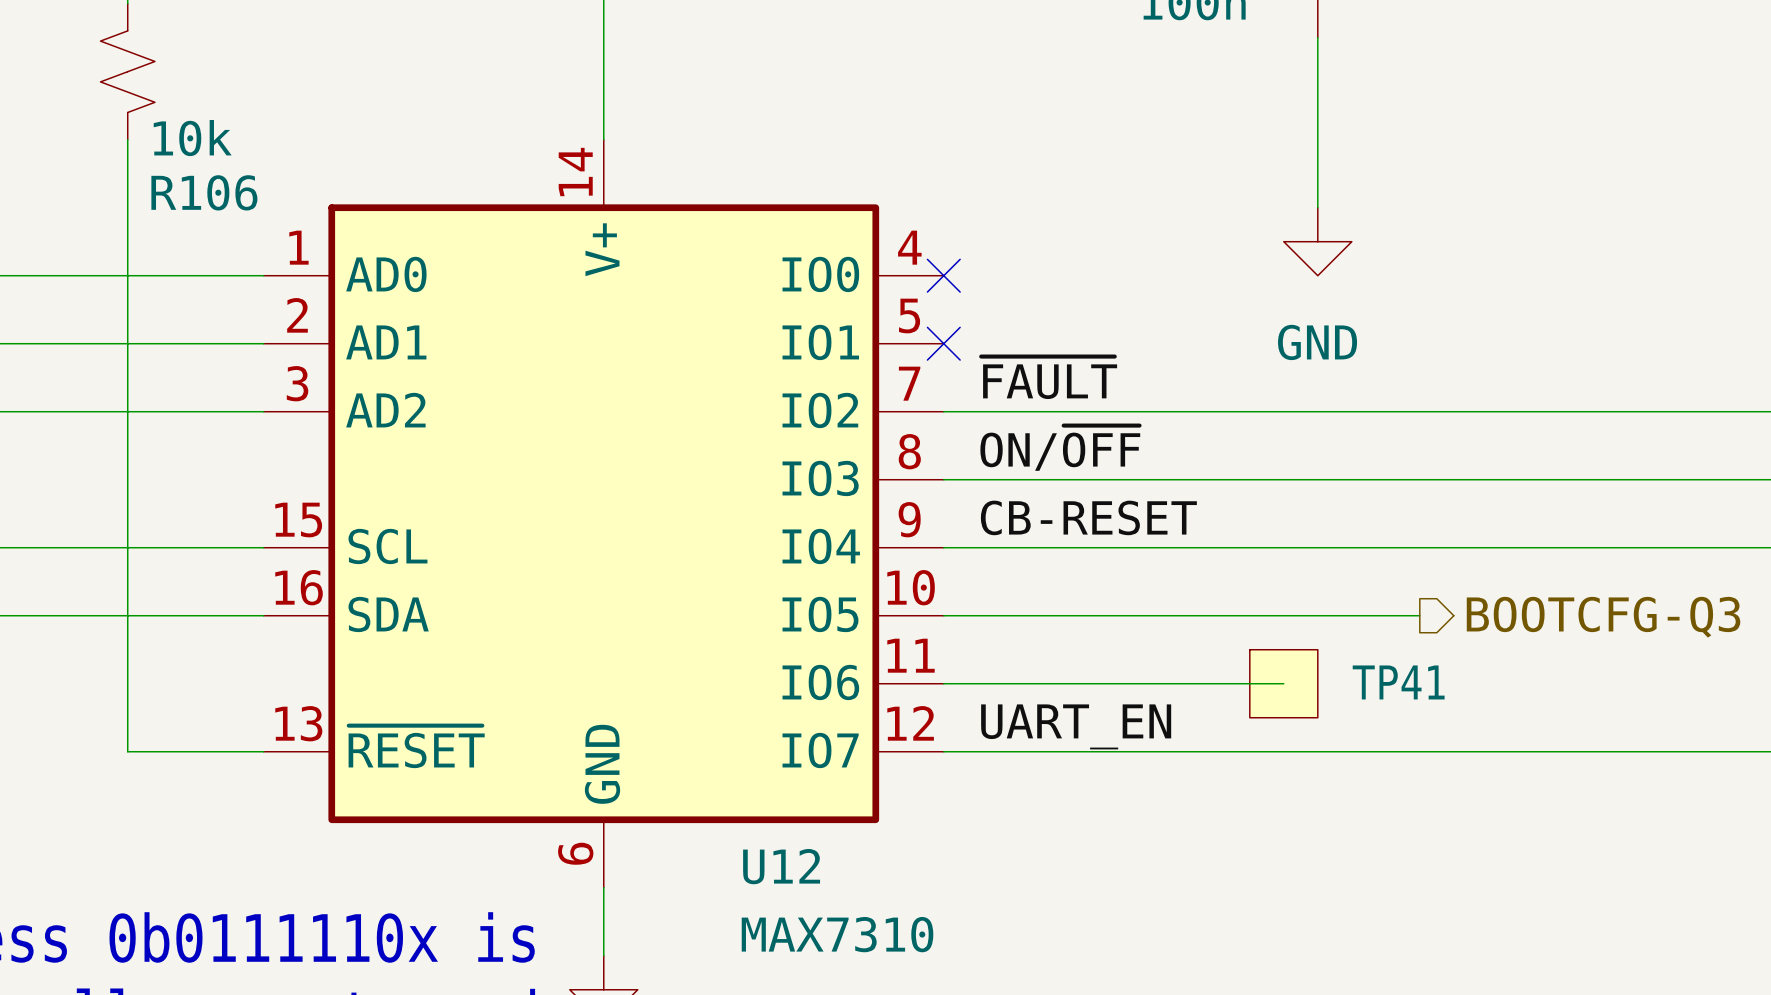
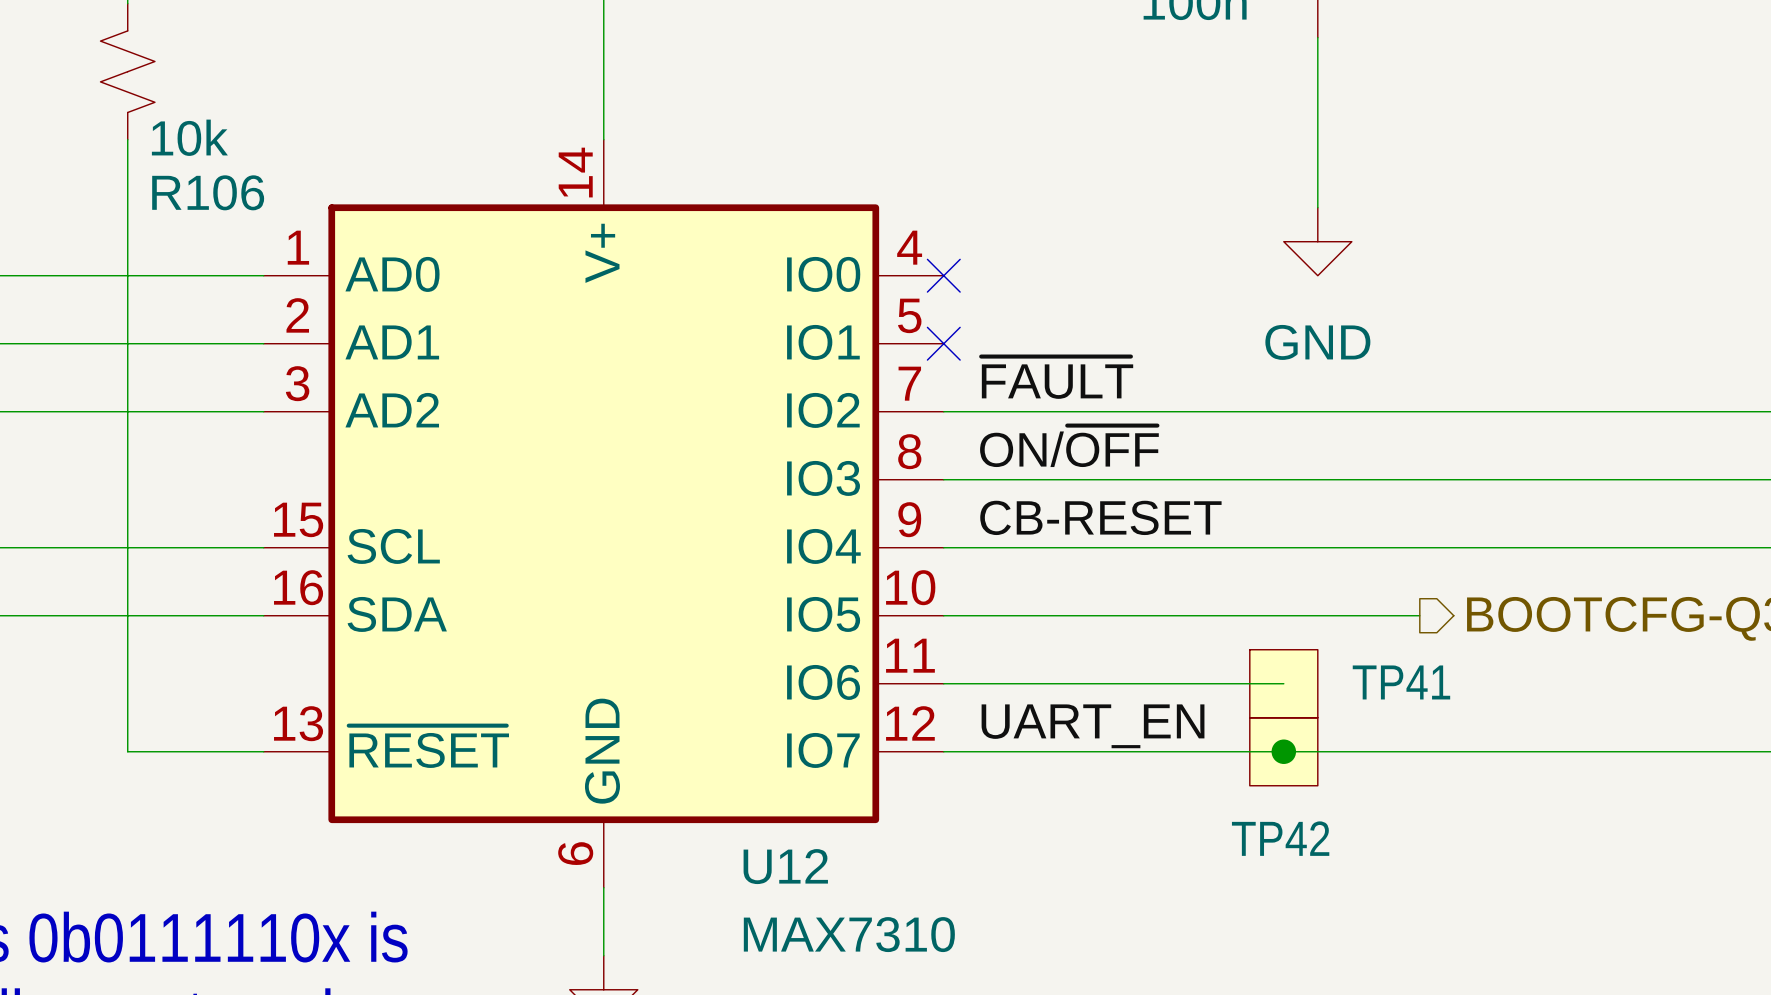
junction: none -> (1283, 751)
TP42: none -> (1283, 751)

